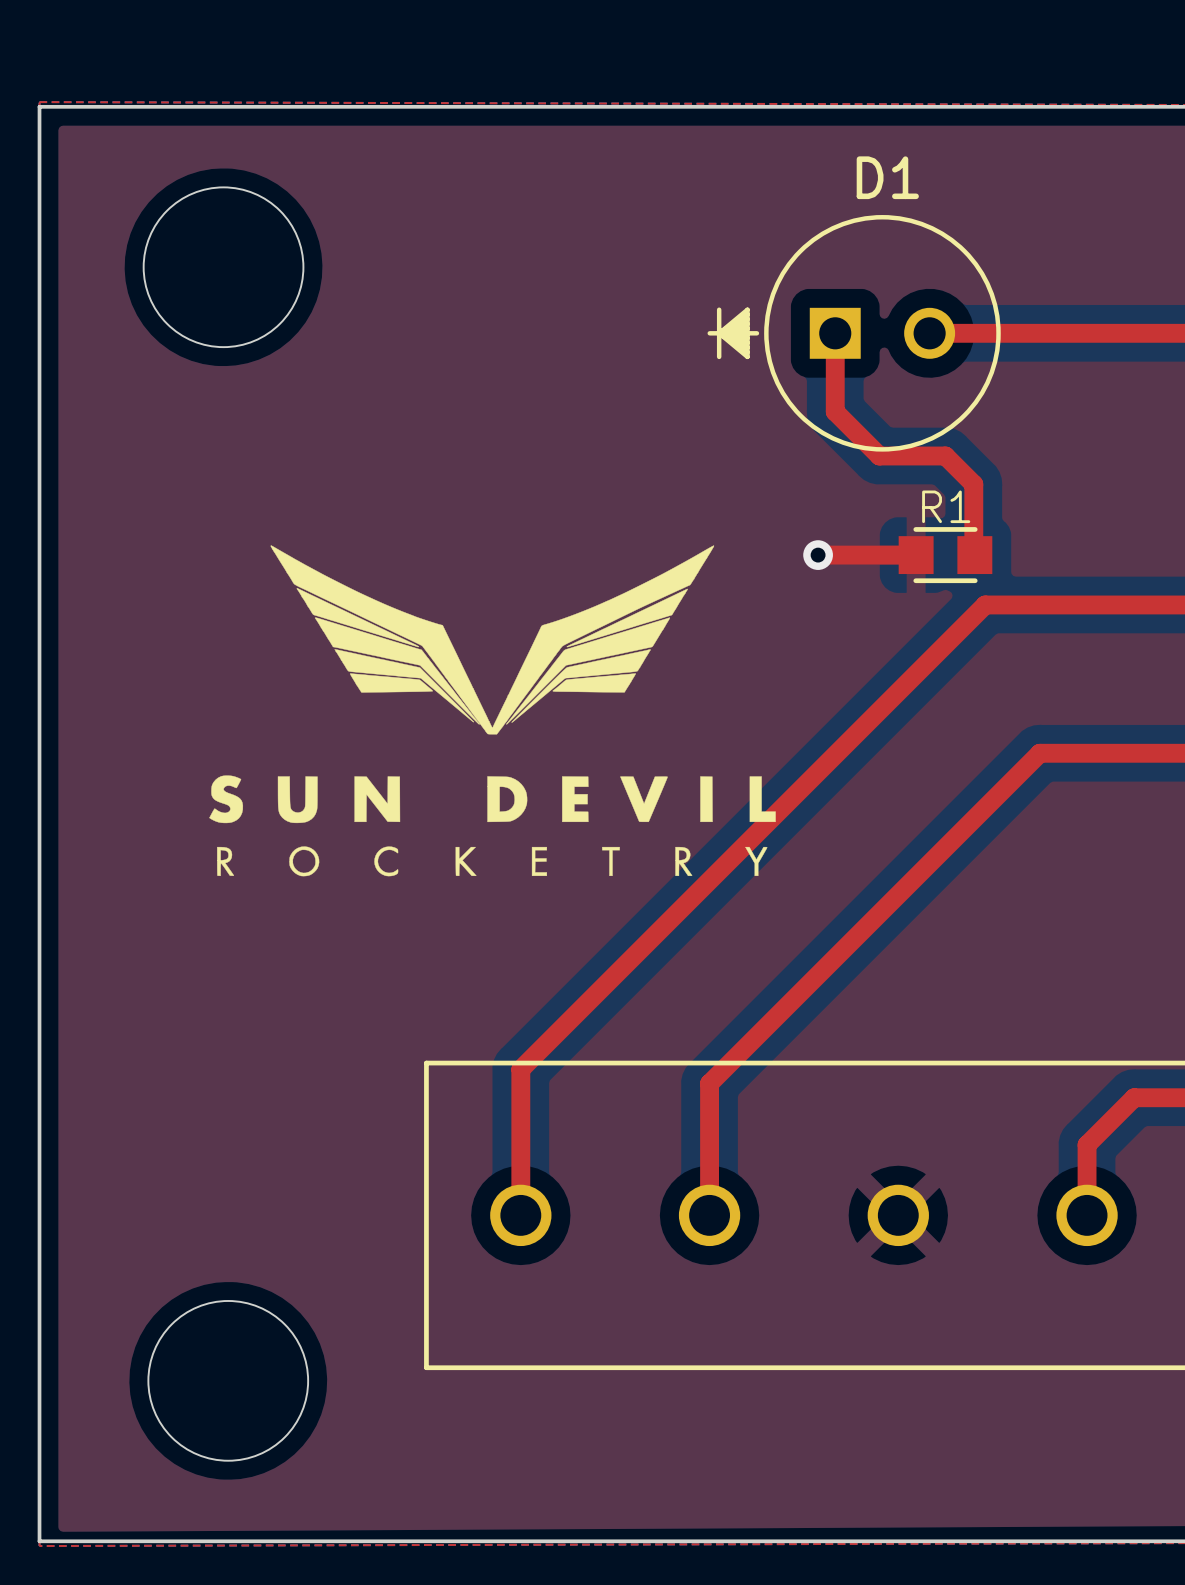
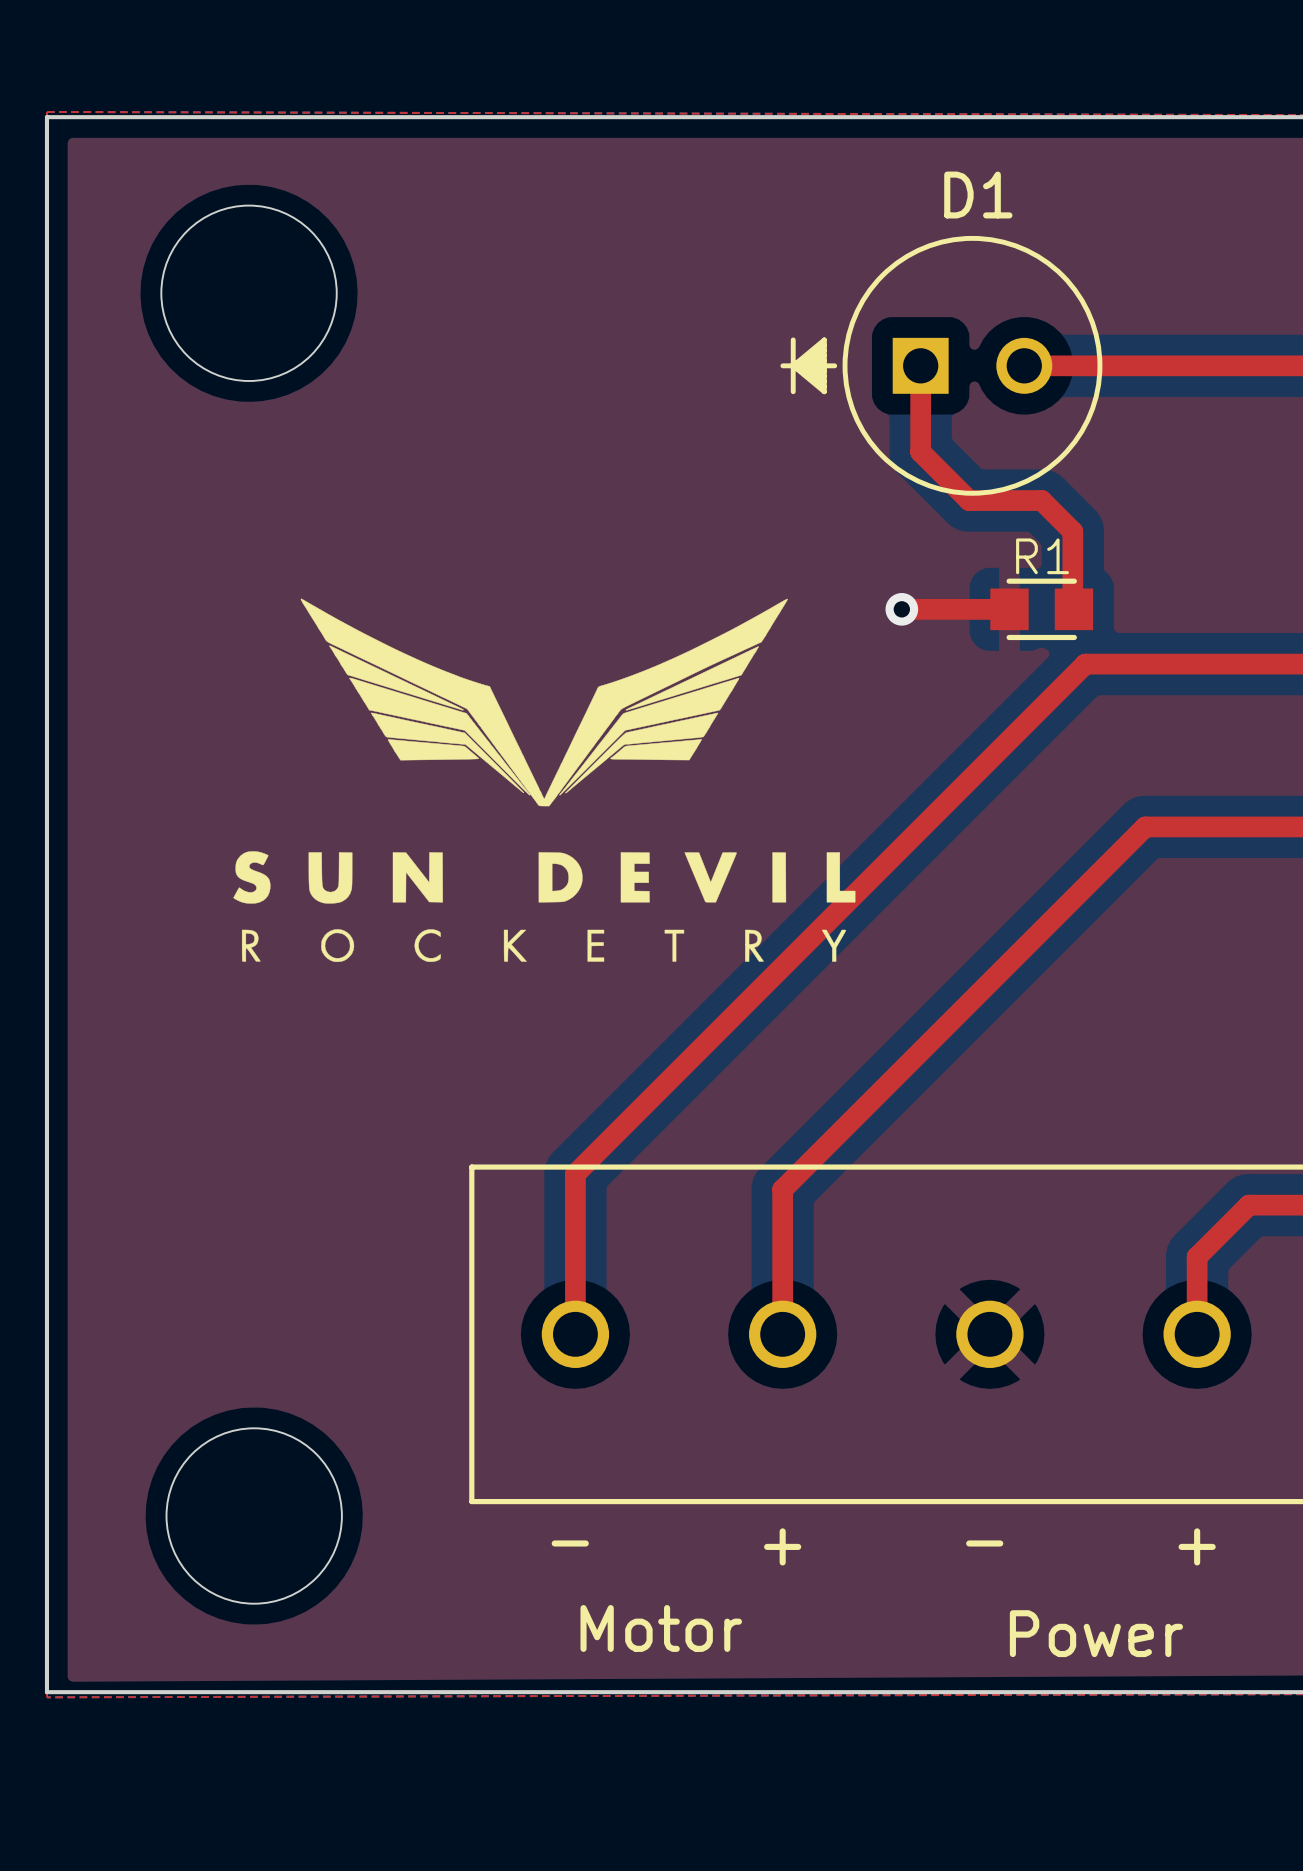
text: none -> - (570, 1543)
text: none -> - (984, 1543)
text: none -> + (782, 1546)
text: none -> + (1197, 1546)
text: none -> Motor (661, 1628)
text: none -> Power (1096, 1633)

